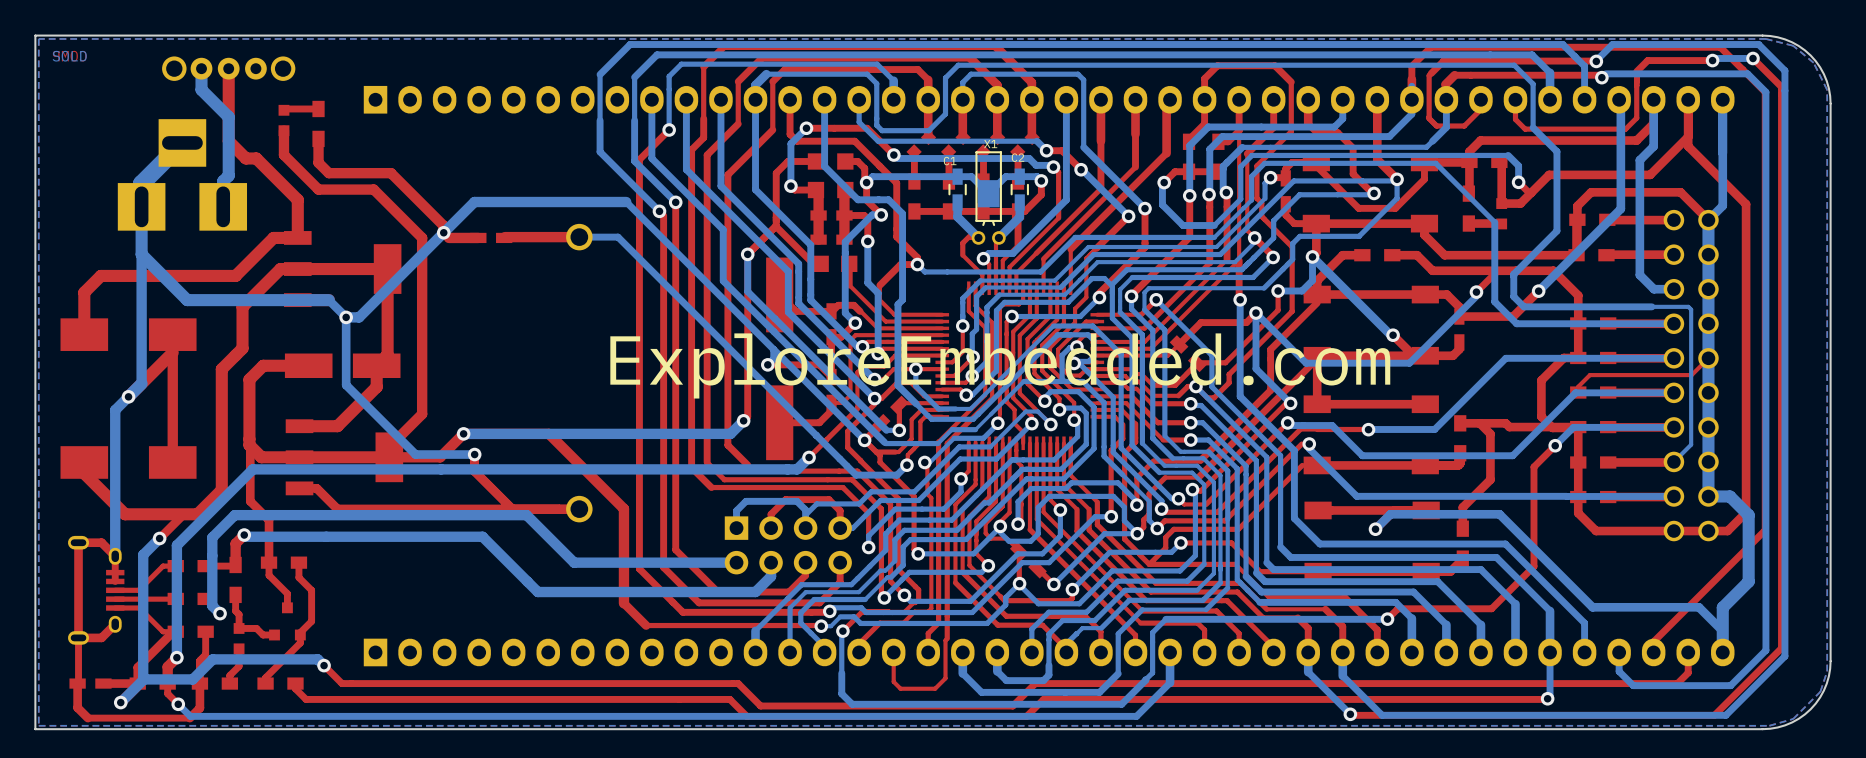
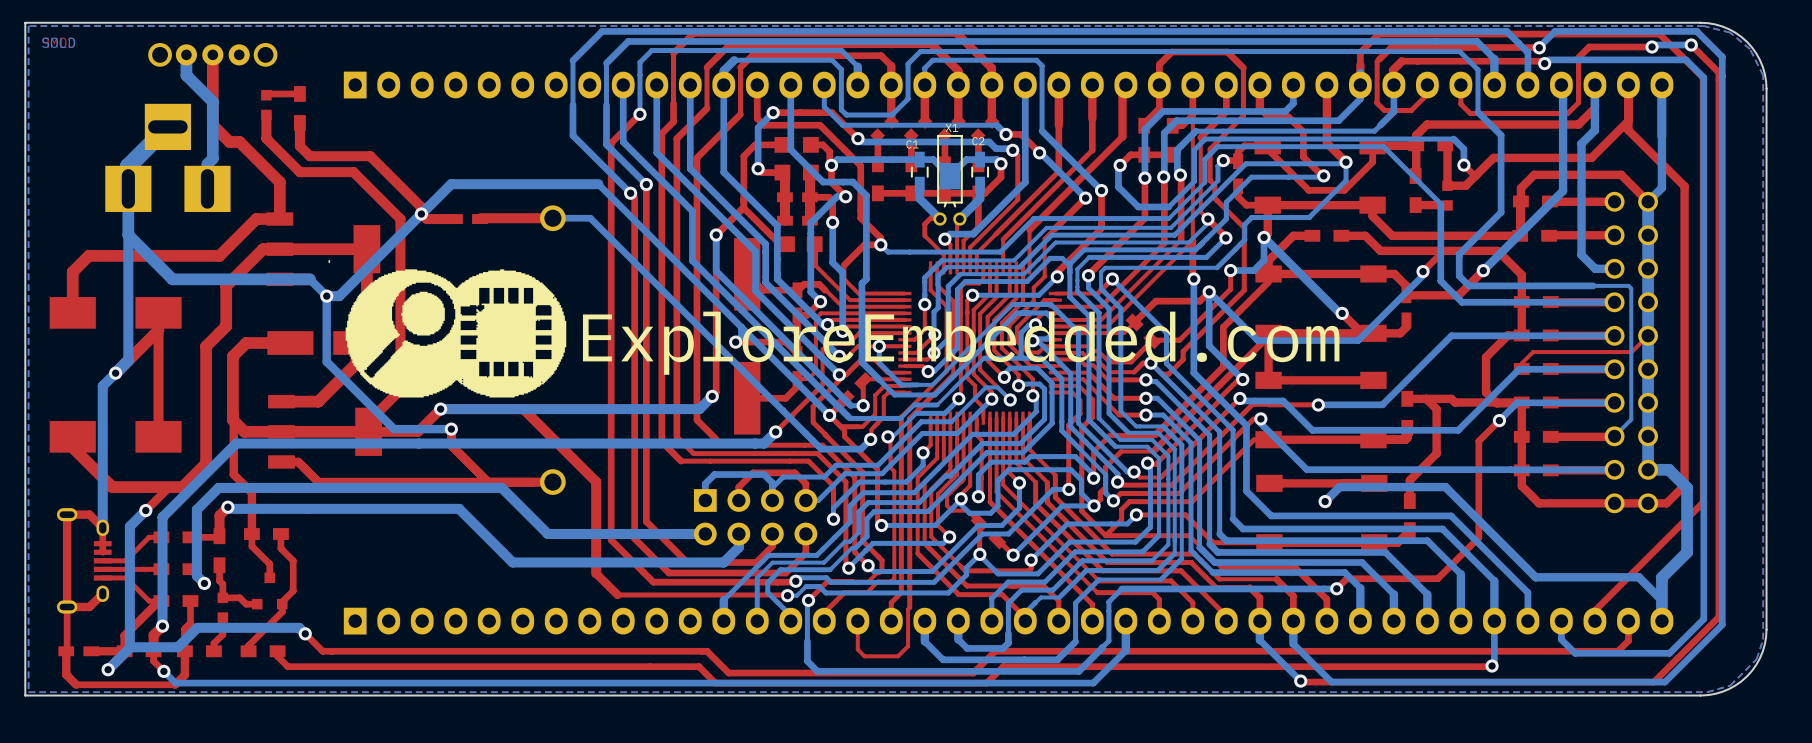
drawing: none -> [328, 260, 567, 398]

